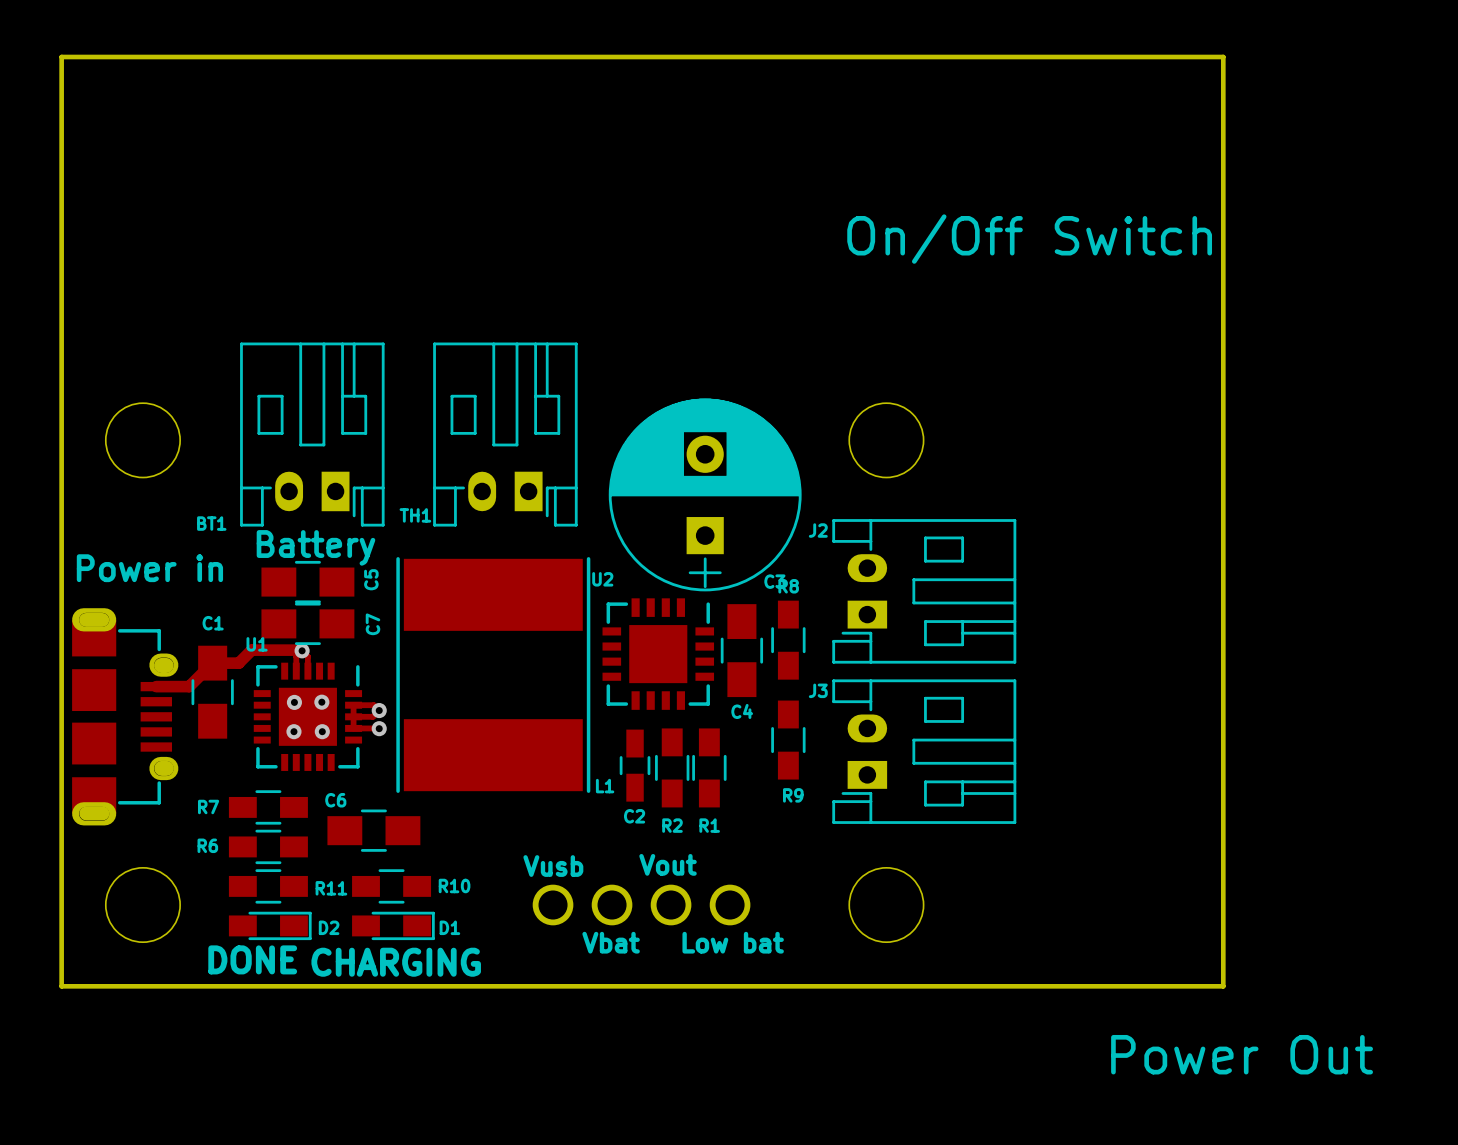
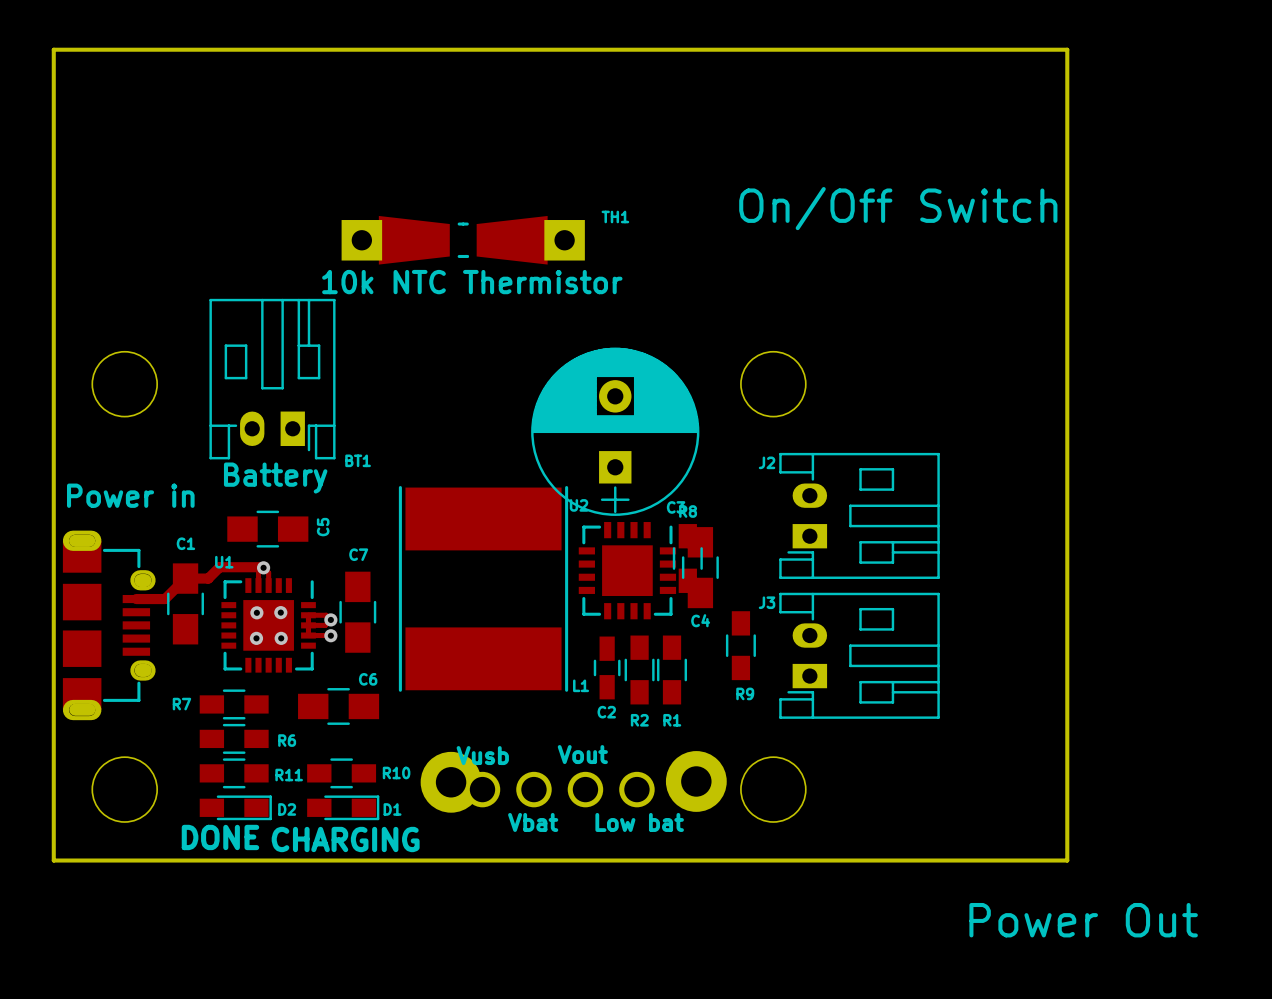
text: none -> 10k NTC Thermistor (472, 282)
TH1 footprint: [433, 342, 578, 527] -> [341, 215, 585, 265]
TH1 name position: TH1 (415, 515) -> TH1 (615, 216)
BT1 name position: BT1 (211, 523) -> BT1 (358, 460)
C5 position: (307, 582) -> (267, 529)
J2 position: (924, 591) -> (859, 515)
C7 rotation: 0° (307, 623) -> 90° clockwise (357, 612)
C7 position: (307, 623) -> (357, 612)
C7 name position: C7 (372, 624) -> C7 (358, 554)
C4 position: (741, 650) -> (700, 567)
U2 position: (658, 654) -> (627, 570)
L1 position: (493, 675) -> (483, 588)
R9 position: (788, 740) -> (740, 645)
J3 position: (924, 751) -> (859, 655)
C2 position: (635, 765) -> (607, 667)
R2 position: (672, 767) -> (639, 669)
R1 position: (709, 767) -> (672, 669)
C6 name position: C6 (335, 800) -> C6 (368, 679)
C6 position: (373, 830) -> (338, 706)
R6 name position: R6 (207, 845) -> R6 (287, 740)
part: none -> (696, 781)
part: none -> (451, 782)

